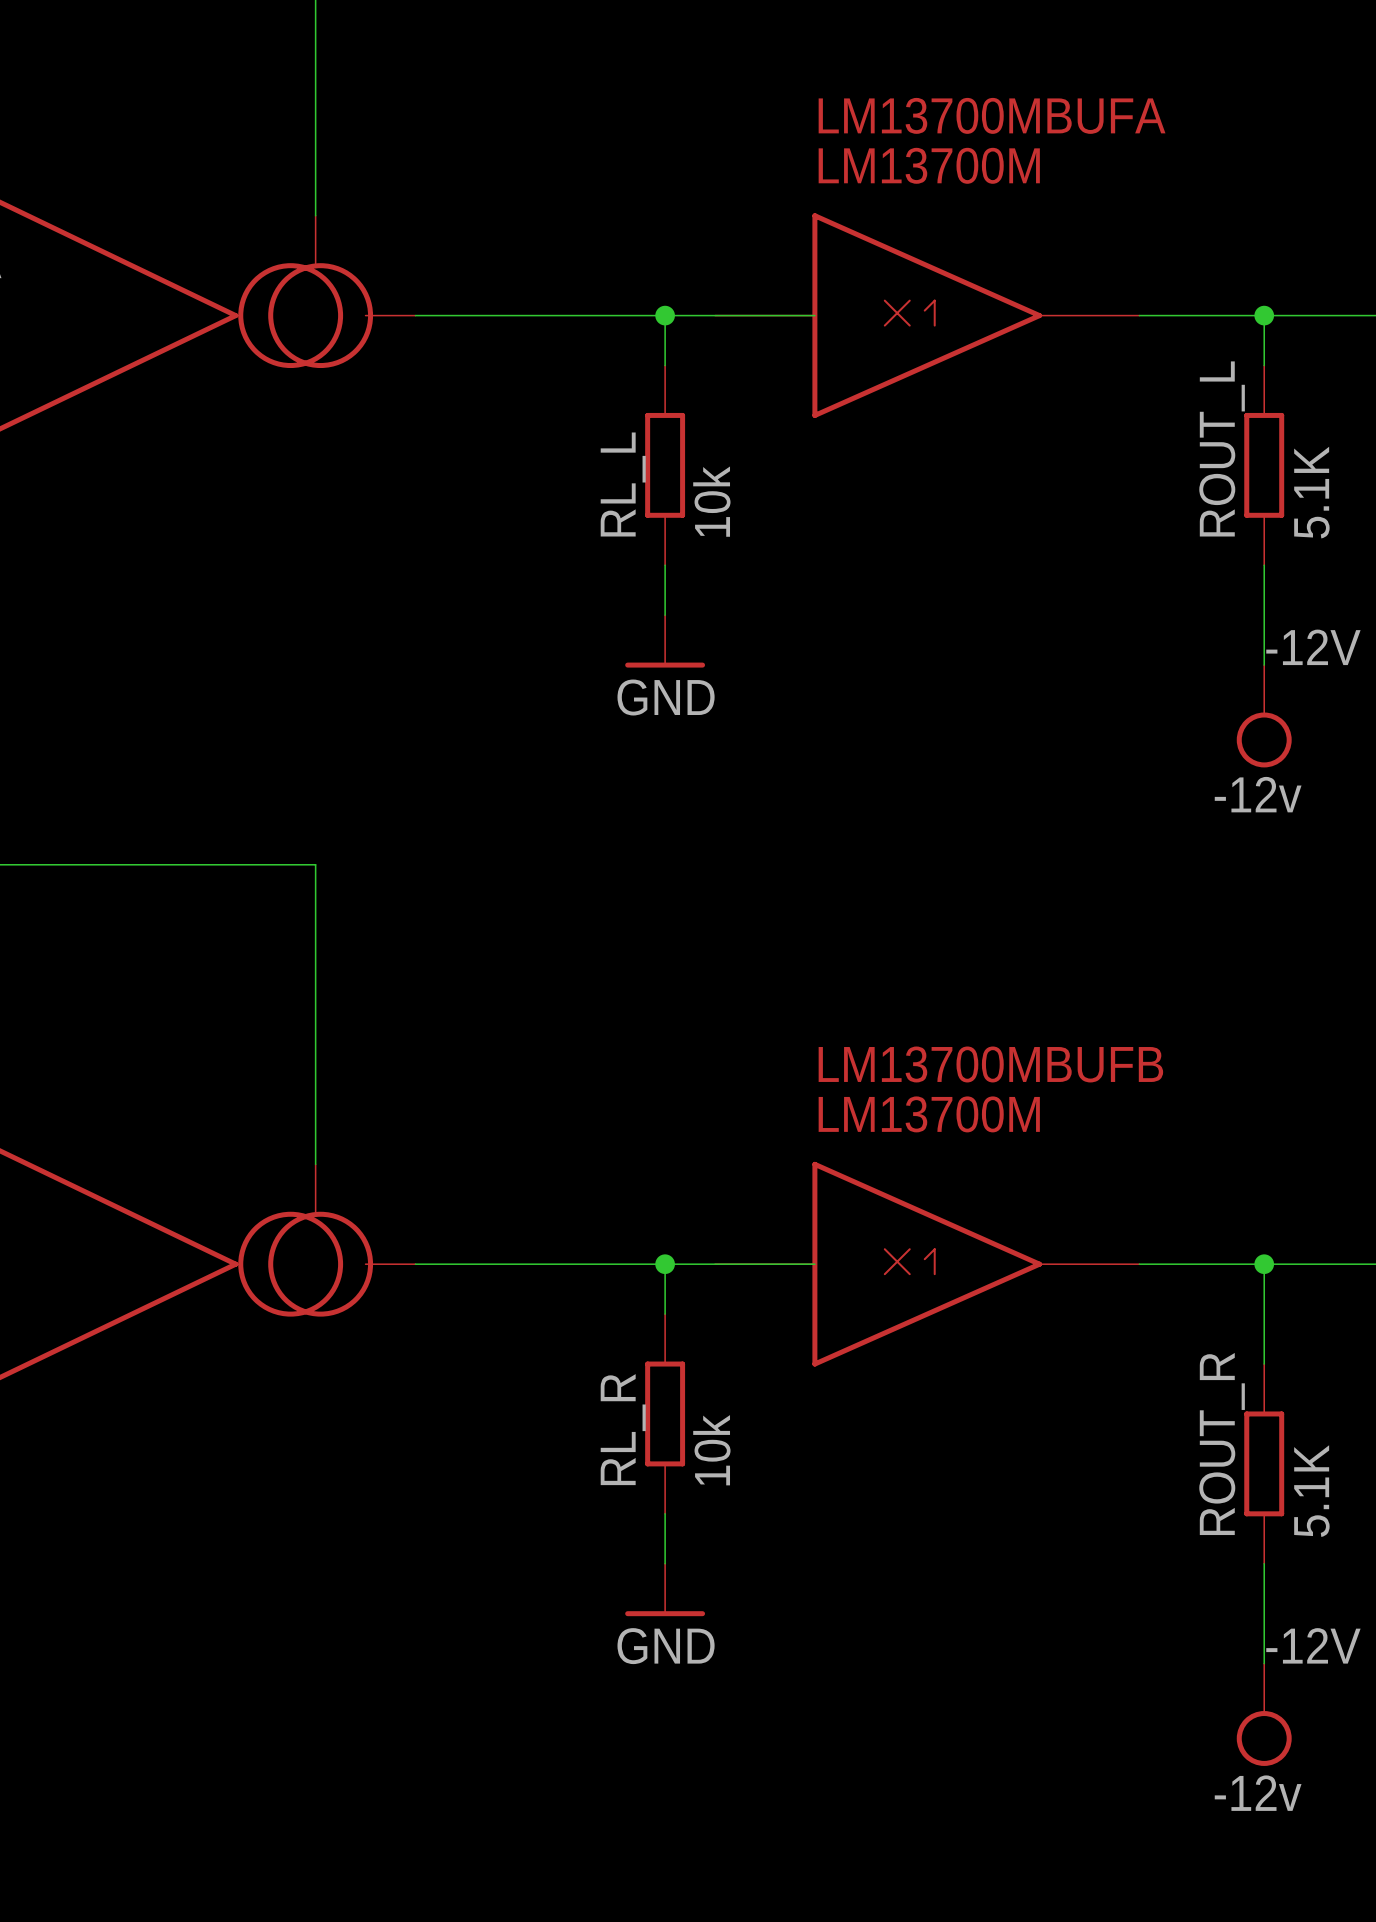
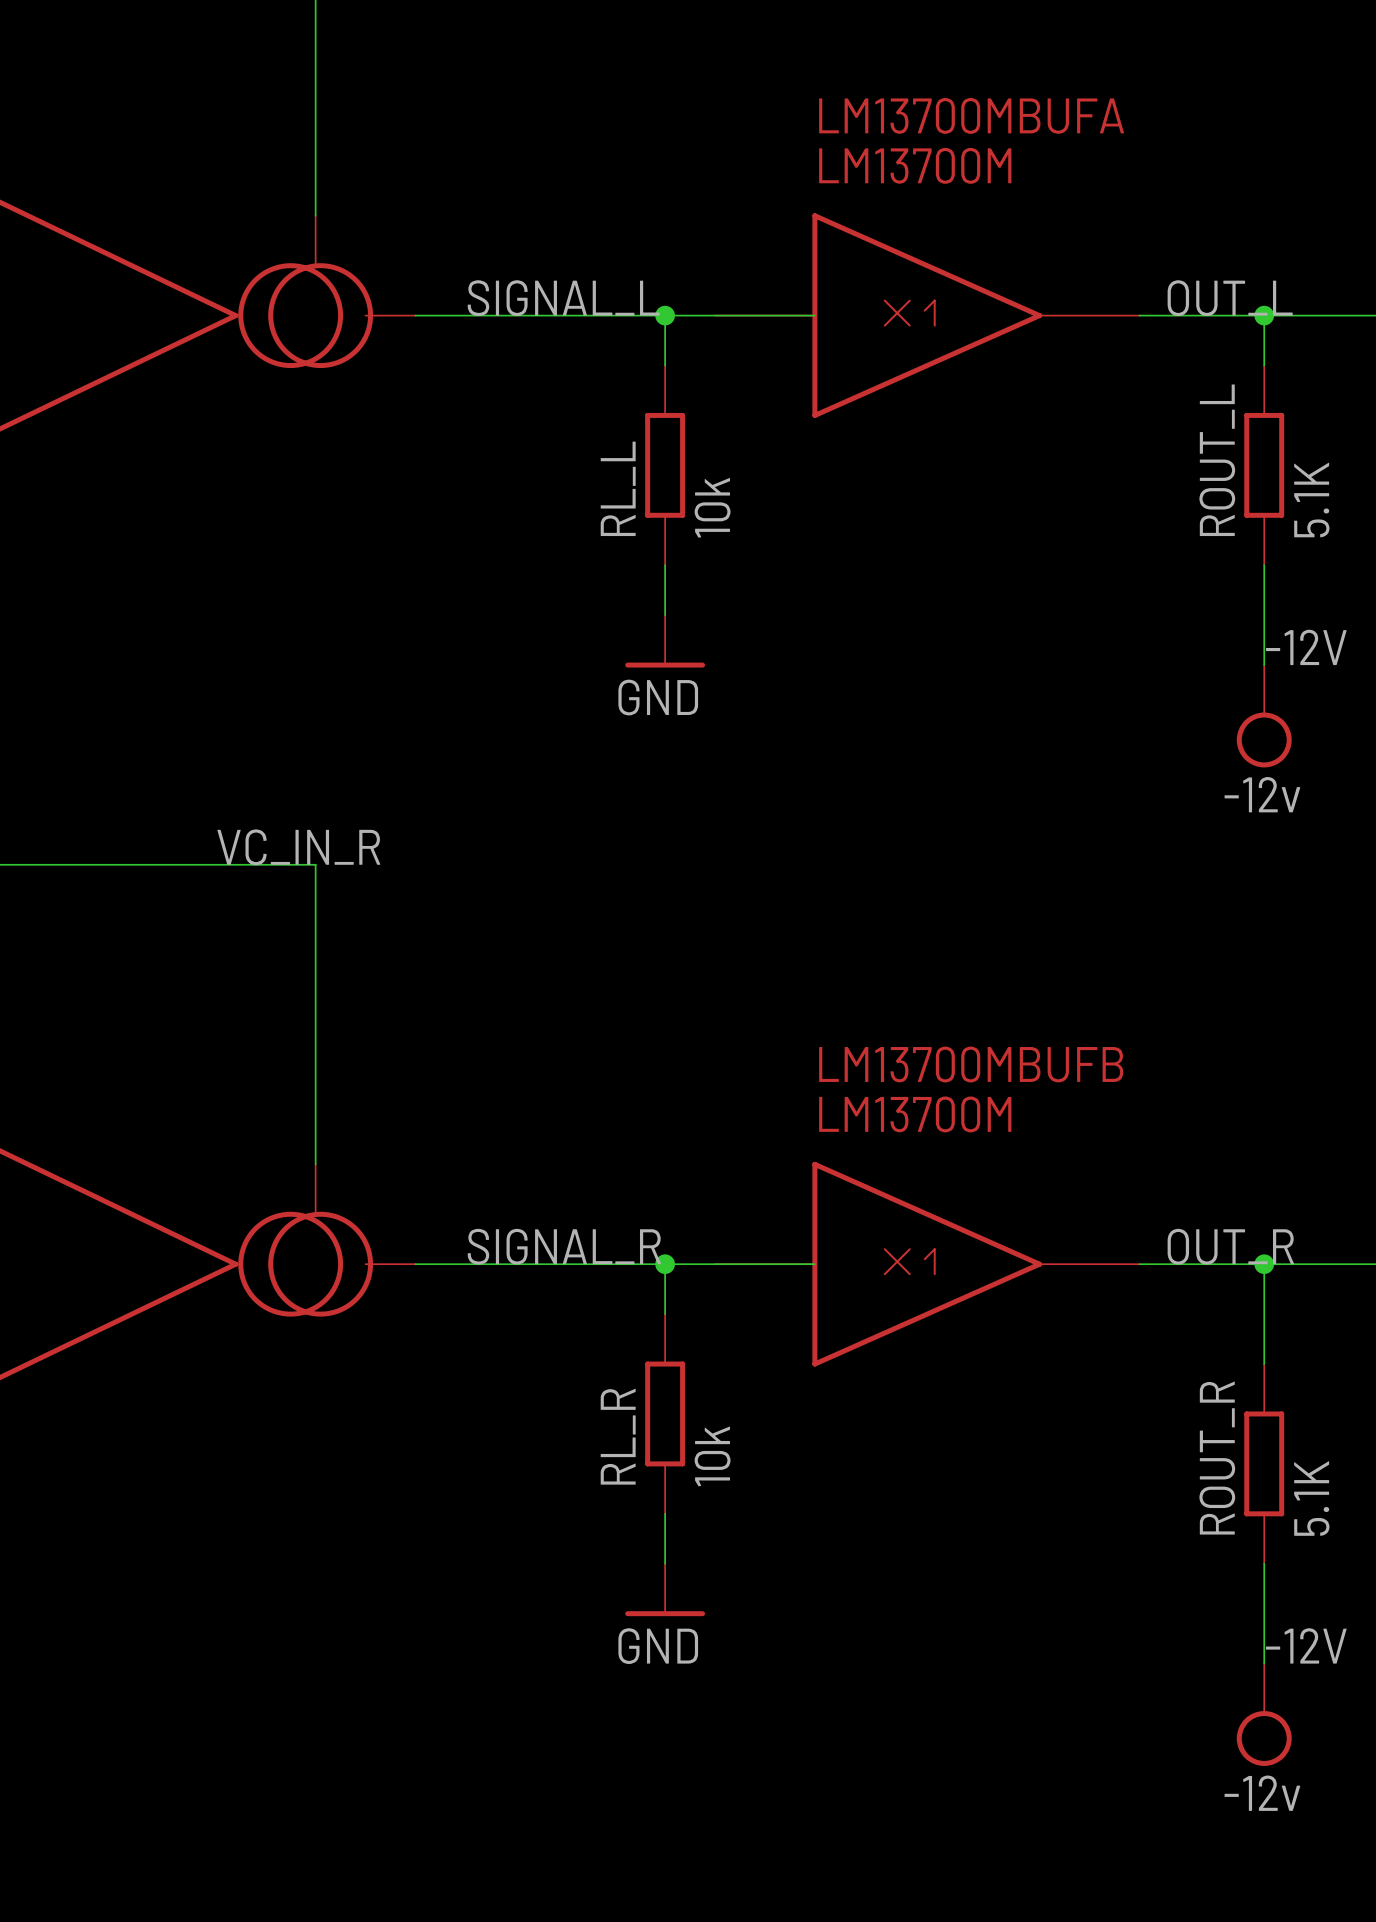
label: none -> SIGNAL_L (563, 298)
label: none -> OUT_L (1230, 298)
label: none -> VC_IN_R (298, 847)
label: none -> SIGNAL_R (564, 1246)
label: none -> OUT_R (1230, 1246)

